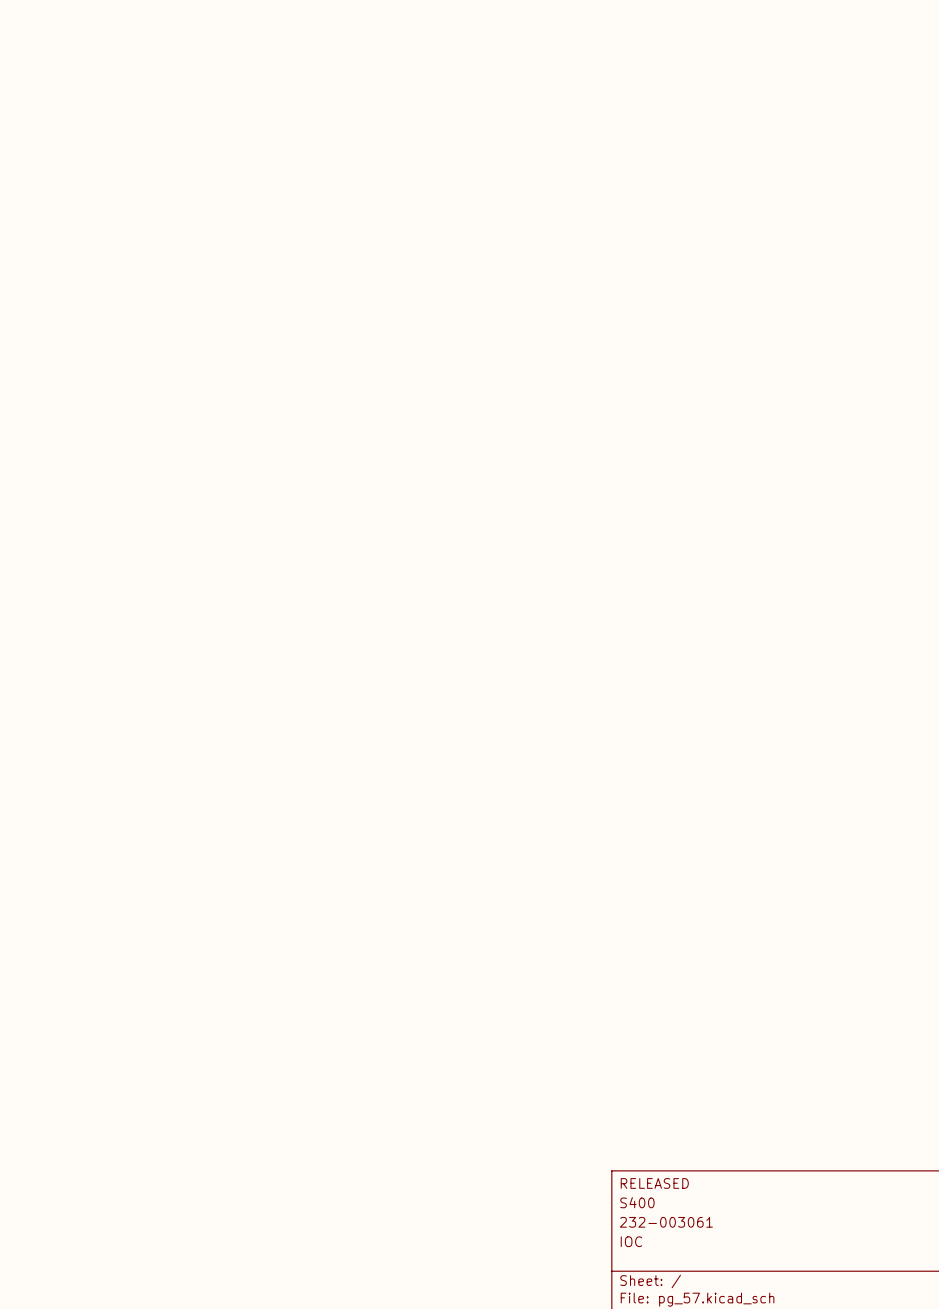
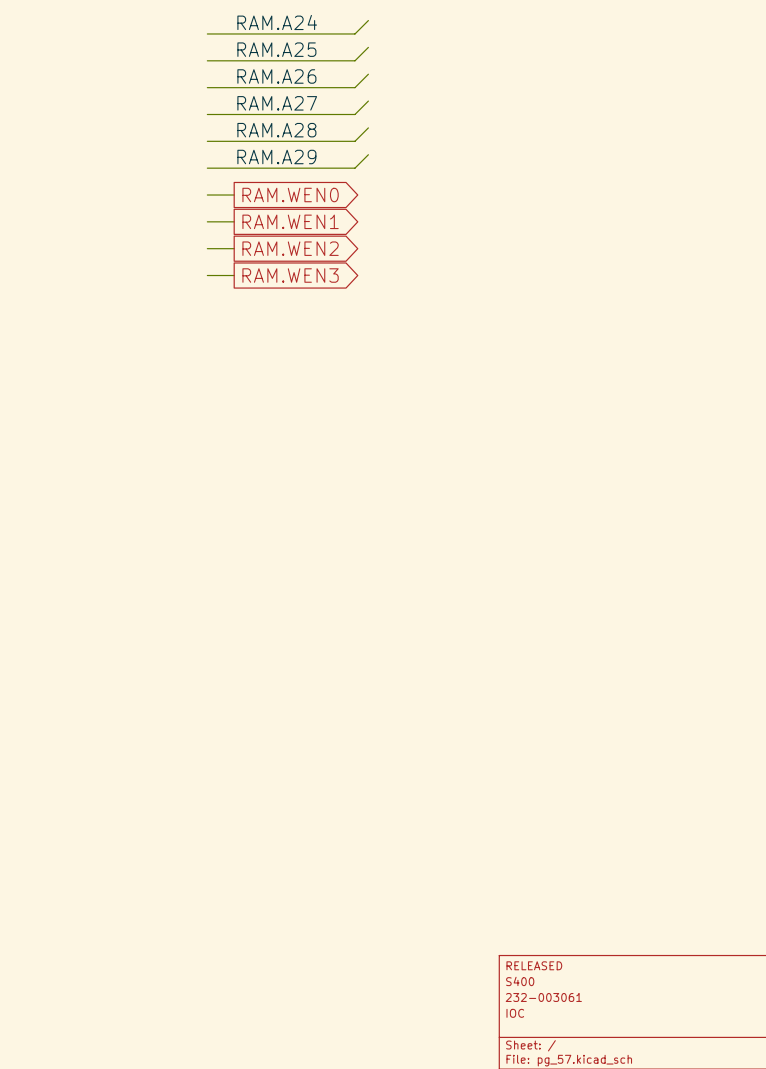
wire: none -> (368, 20) (354, 33) (207, 33)
label: none -> RAM.A24 (277, 22)
wire: none -> (368, 47) (354, 60) (207, 60)
label: none -> RAM.A25 (276, 49)
wire: none -> (368, 74) (354, 87) (207, 87)
label: none -> RAM.A26 (276, 76)
wire: none -> (368, 101) (354, 114) (207, 114)
label: none -> RAM.A27 (277, 103)
wire: none -> (368, 127) (354, 141) (207, 141)
label: none -> RAM.A28 (276, 130)
wire: none -> (368, 154) (354, 168) (207, 168)
label: none -> RAM.A29 (276, 157)
wire: none -> (207, 195) (234, 195)
global label: none -> RAM.WEN0 (290, 195)
wire: none -> (207, 221) (234, 221)
global label: none -> RAM.WEN1 (290, 221)
wire: none -> (207, 248) (234, 248)
global label: none -> RAM.WEN2 (290, 248)
wire: none -> (207, 275) (234, 275)
global label: none -> RAM.WEN3 (290, 275)

